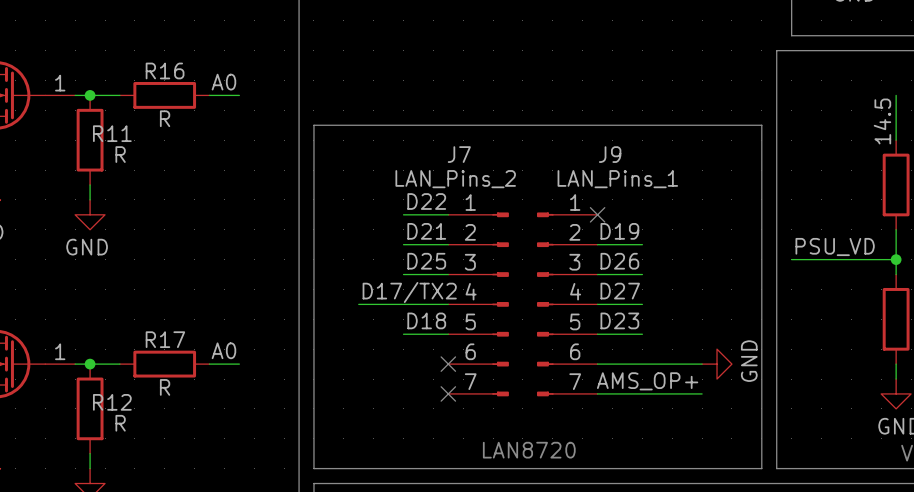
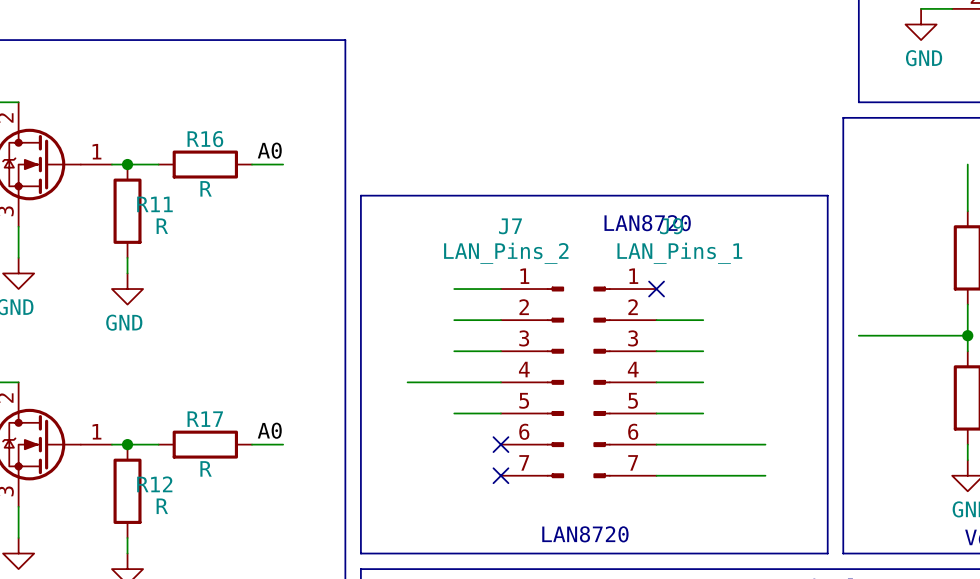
label: 14.5 (882, 121) -> none
text: none -> LAN8720 (647, 223)
label: D22 (426, 201) -> none
label: D21 (426, 231) -> none
label: D19 (619, 231) -> none
label: PSU_VD (835, 247) -> none
label: D25 (426, 261) -> none
label: D26 (619, 261) -> none
label: D27 (620, 291) -> none
label: D17/TX2 (409, 292) -> none
label: D18 (426, 320) -> none
label: D23 (619, 320) -> none
power symbol: GND (717, 364) -> none
label: AMS_OP+ (647, 381) -> none

